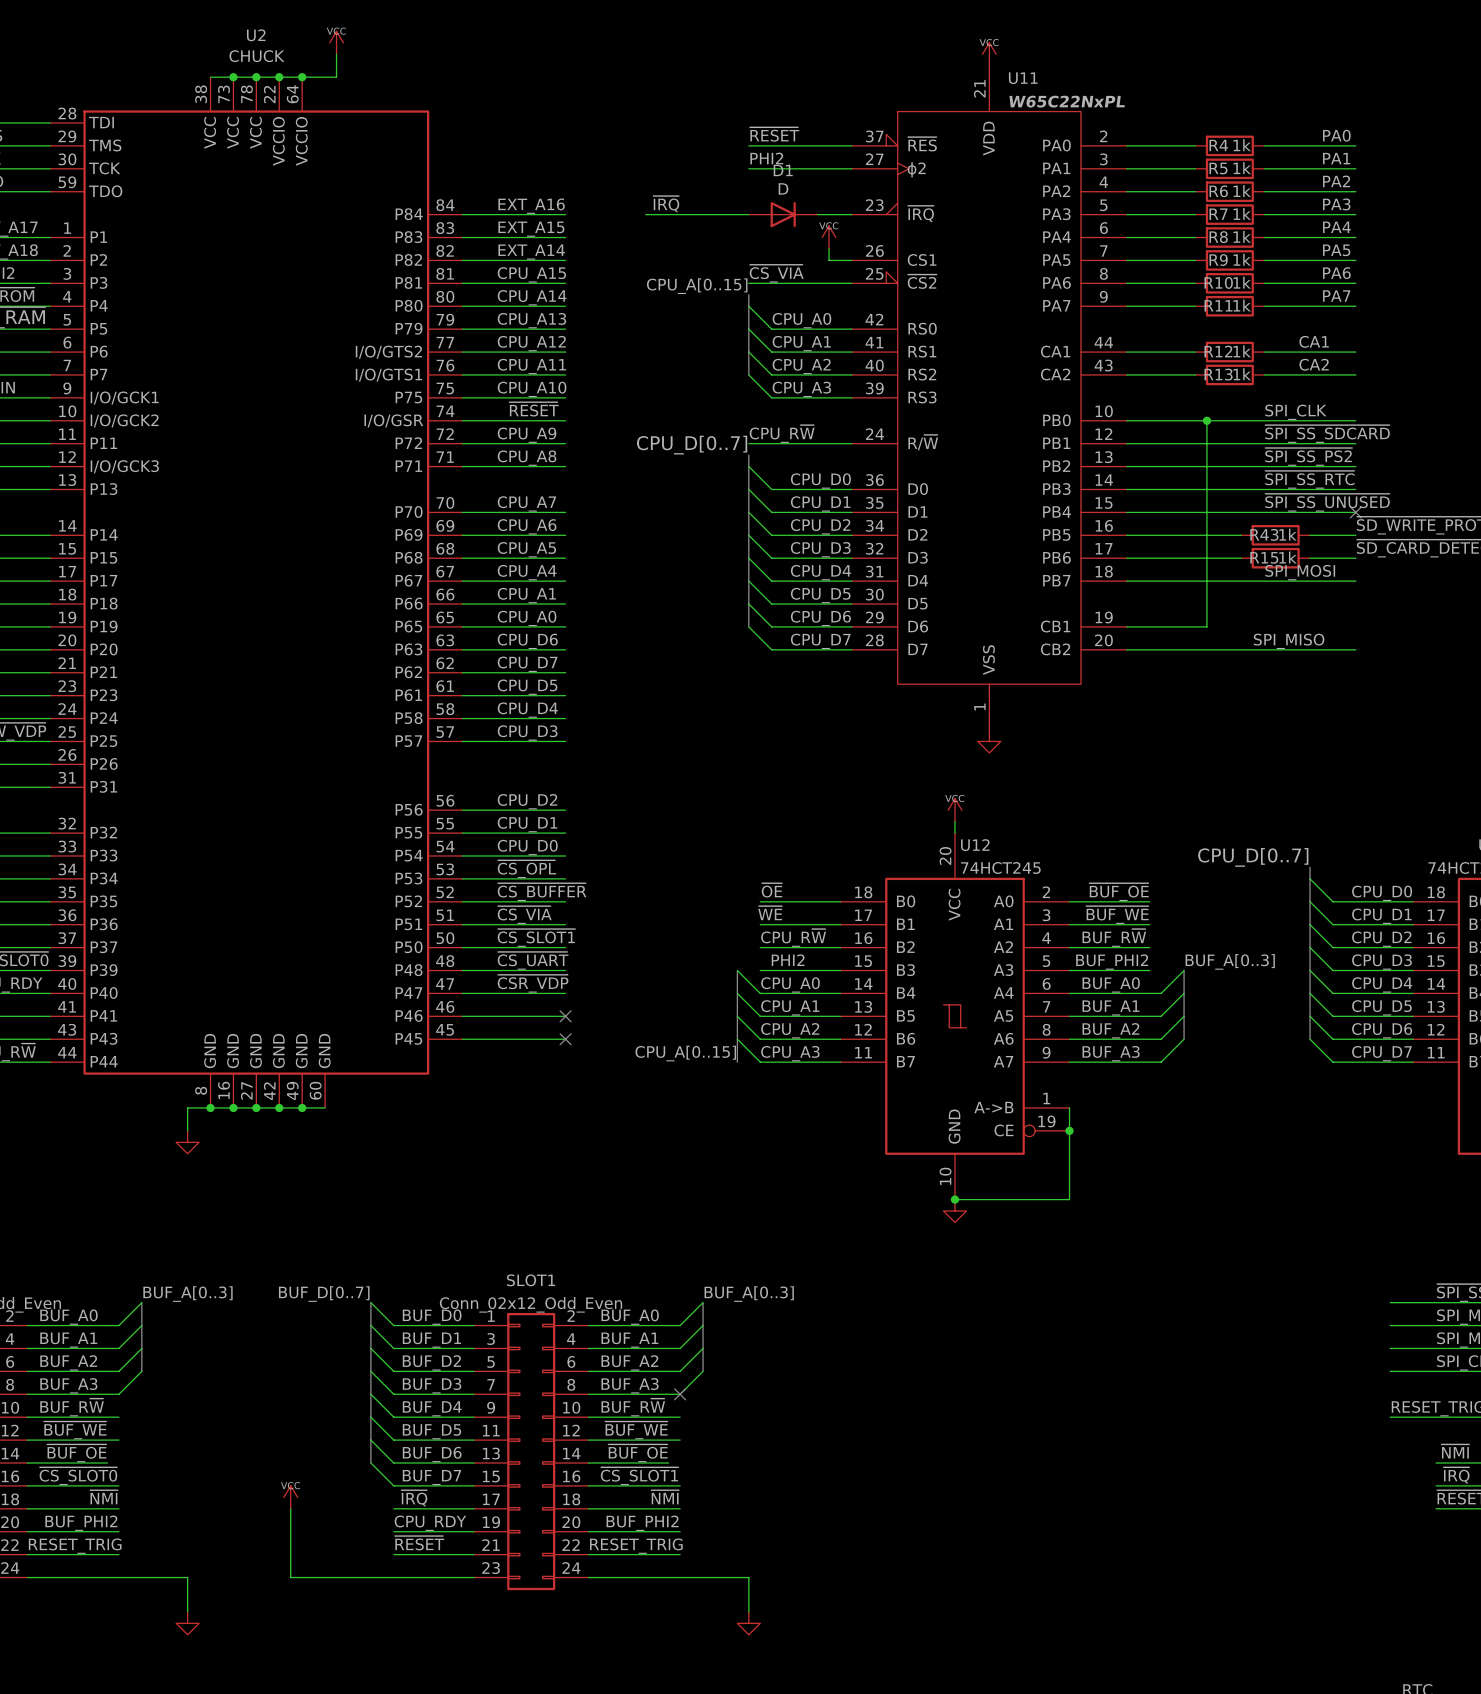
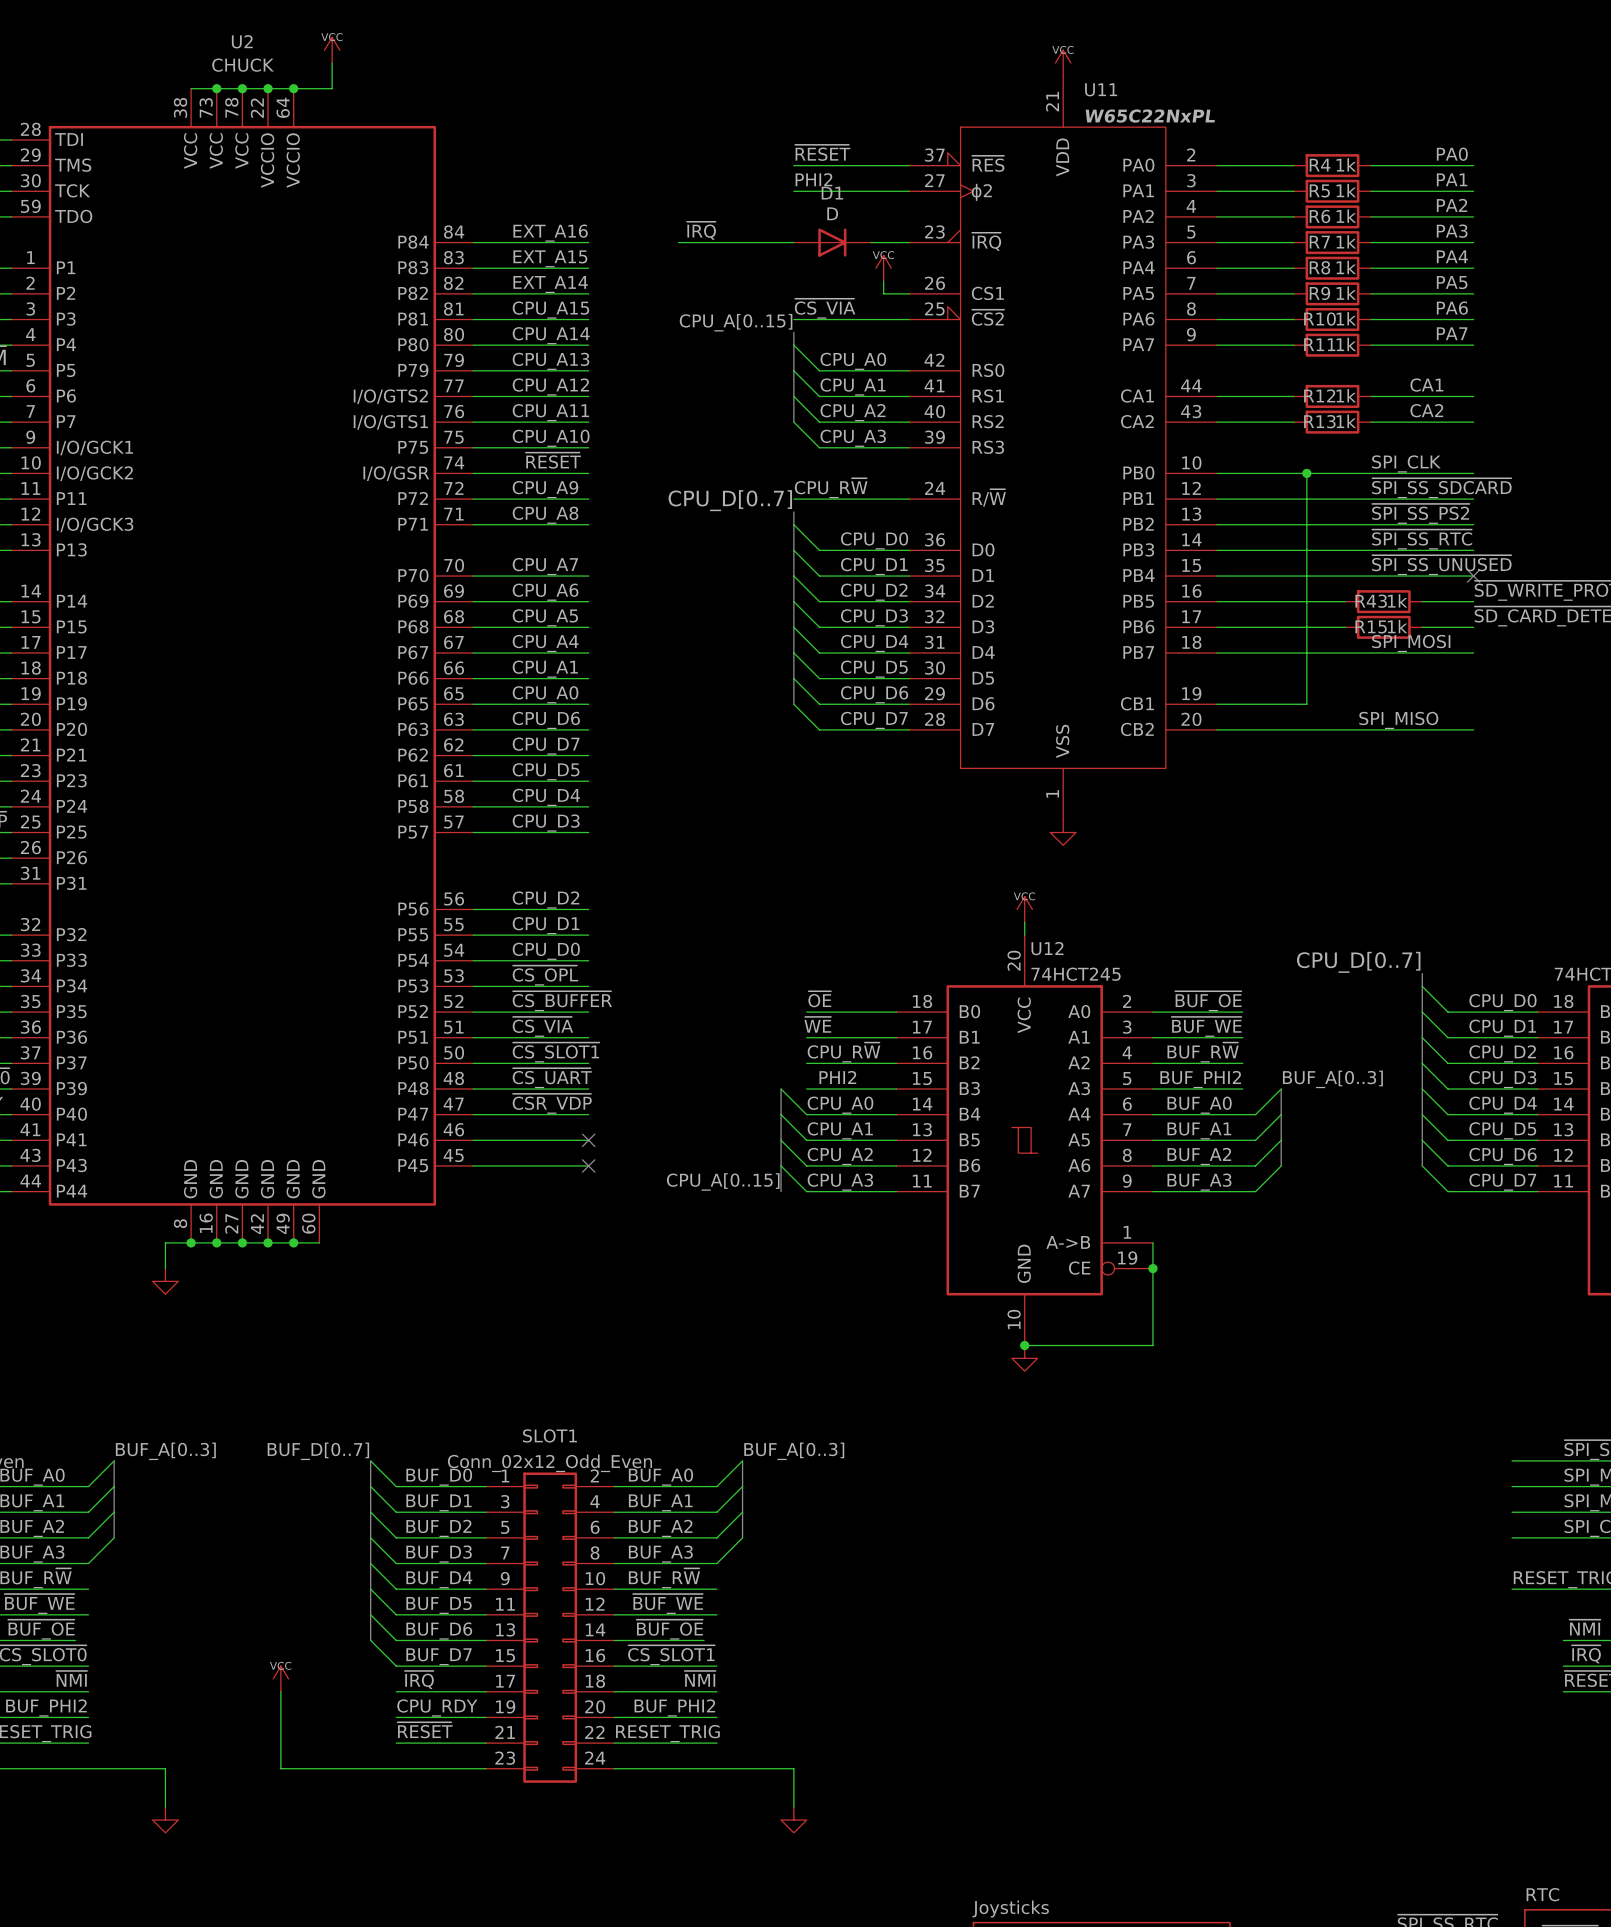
no-connect mark: (680, 1394) -> none

